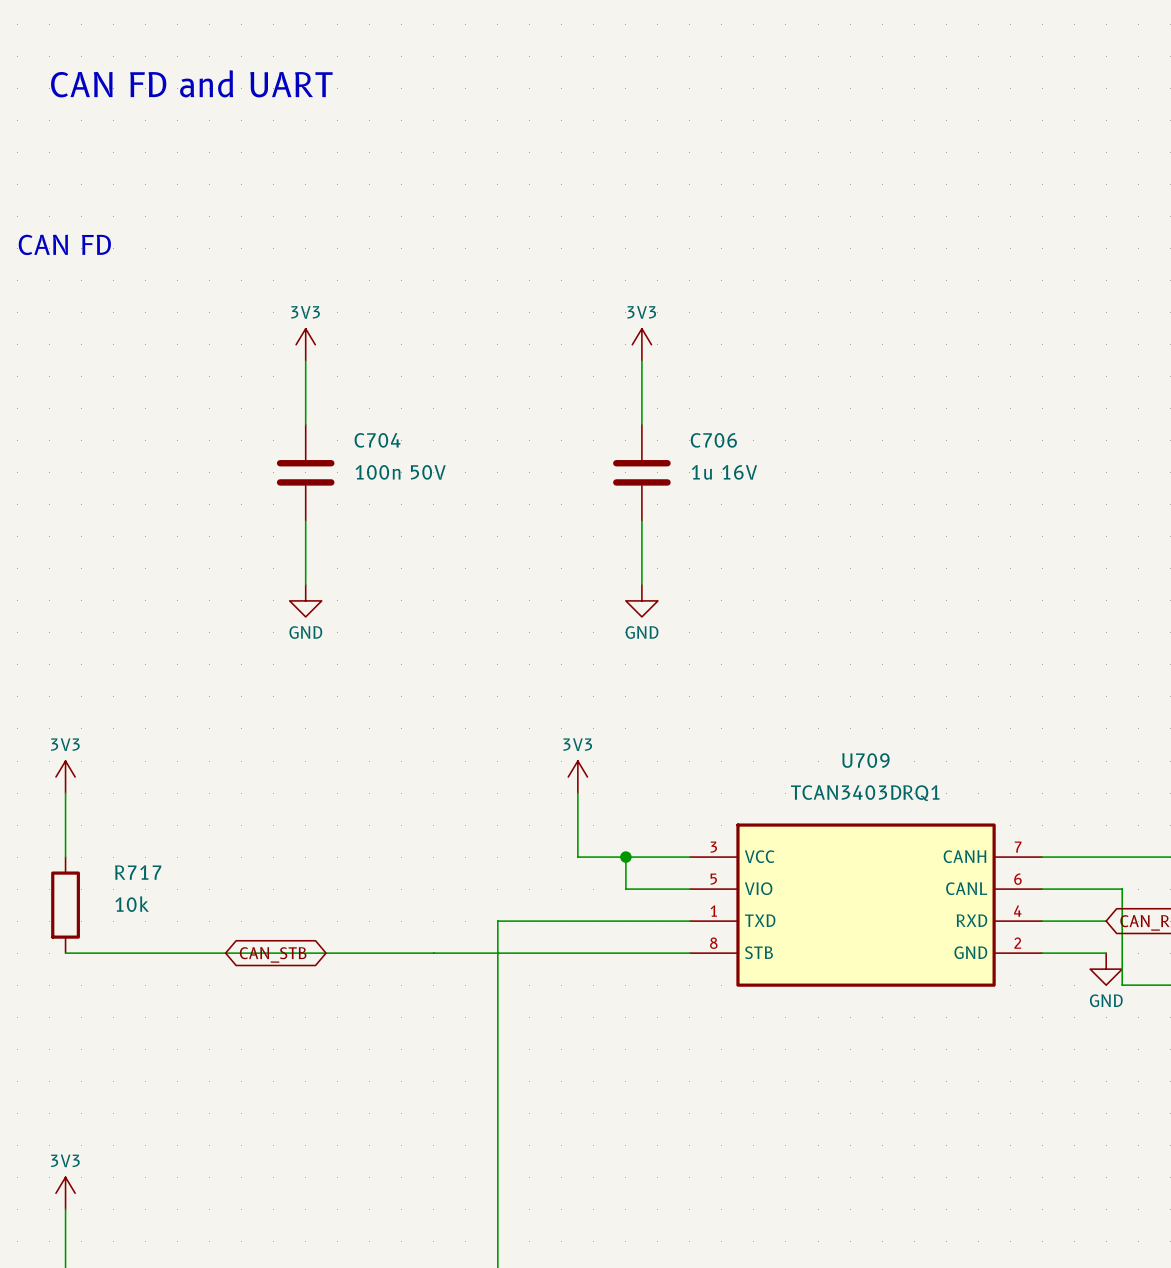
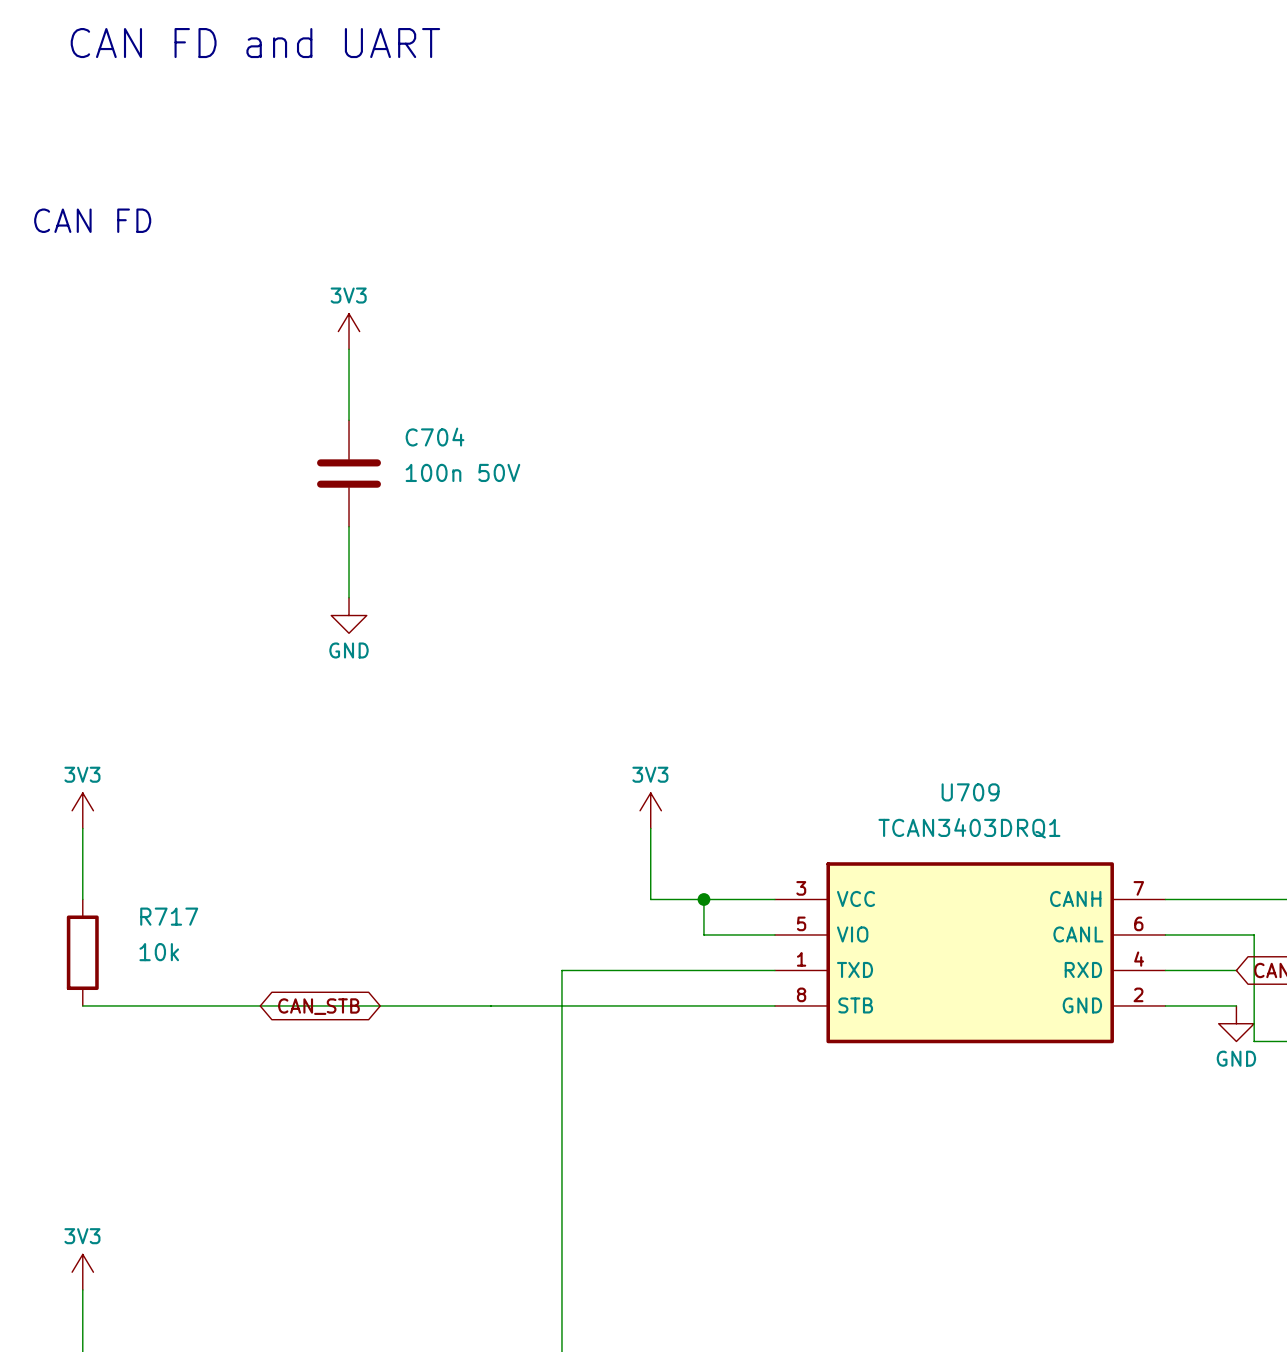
power symbol: 3V3 (641, 344) -> none
wire: (641, 360) (641, 424) -> none
C706: 1u 16V (641, 472) -> none
wire: (641, 520) (641, 584) -> none
power symbol: GND (641, 600) -> none

